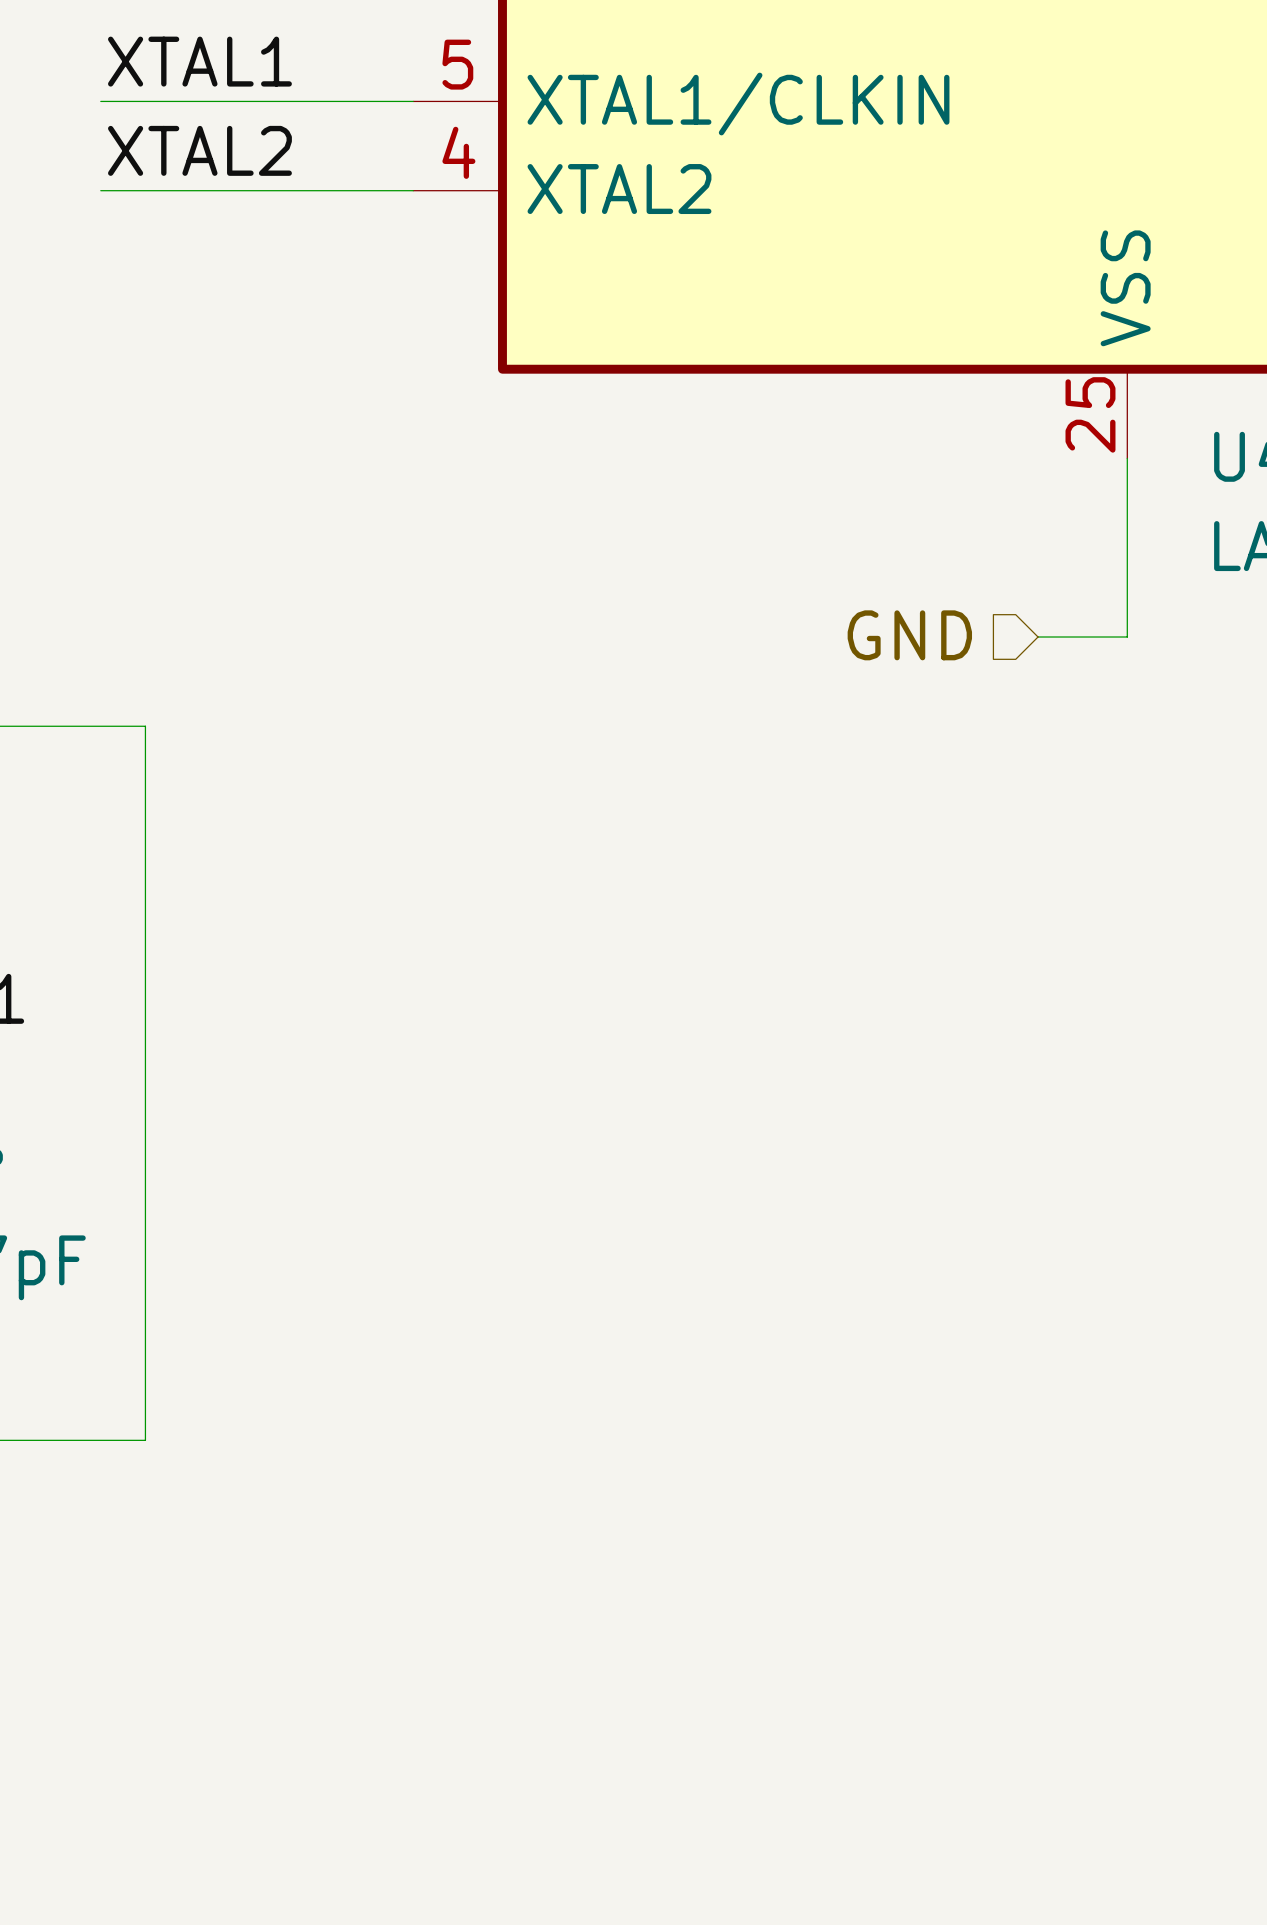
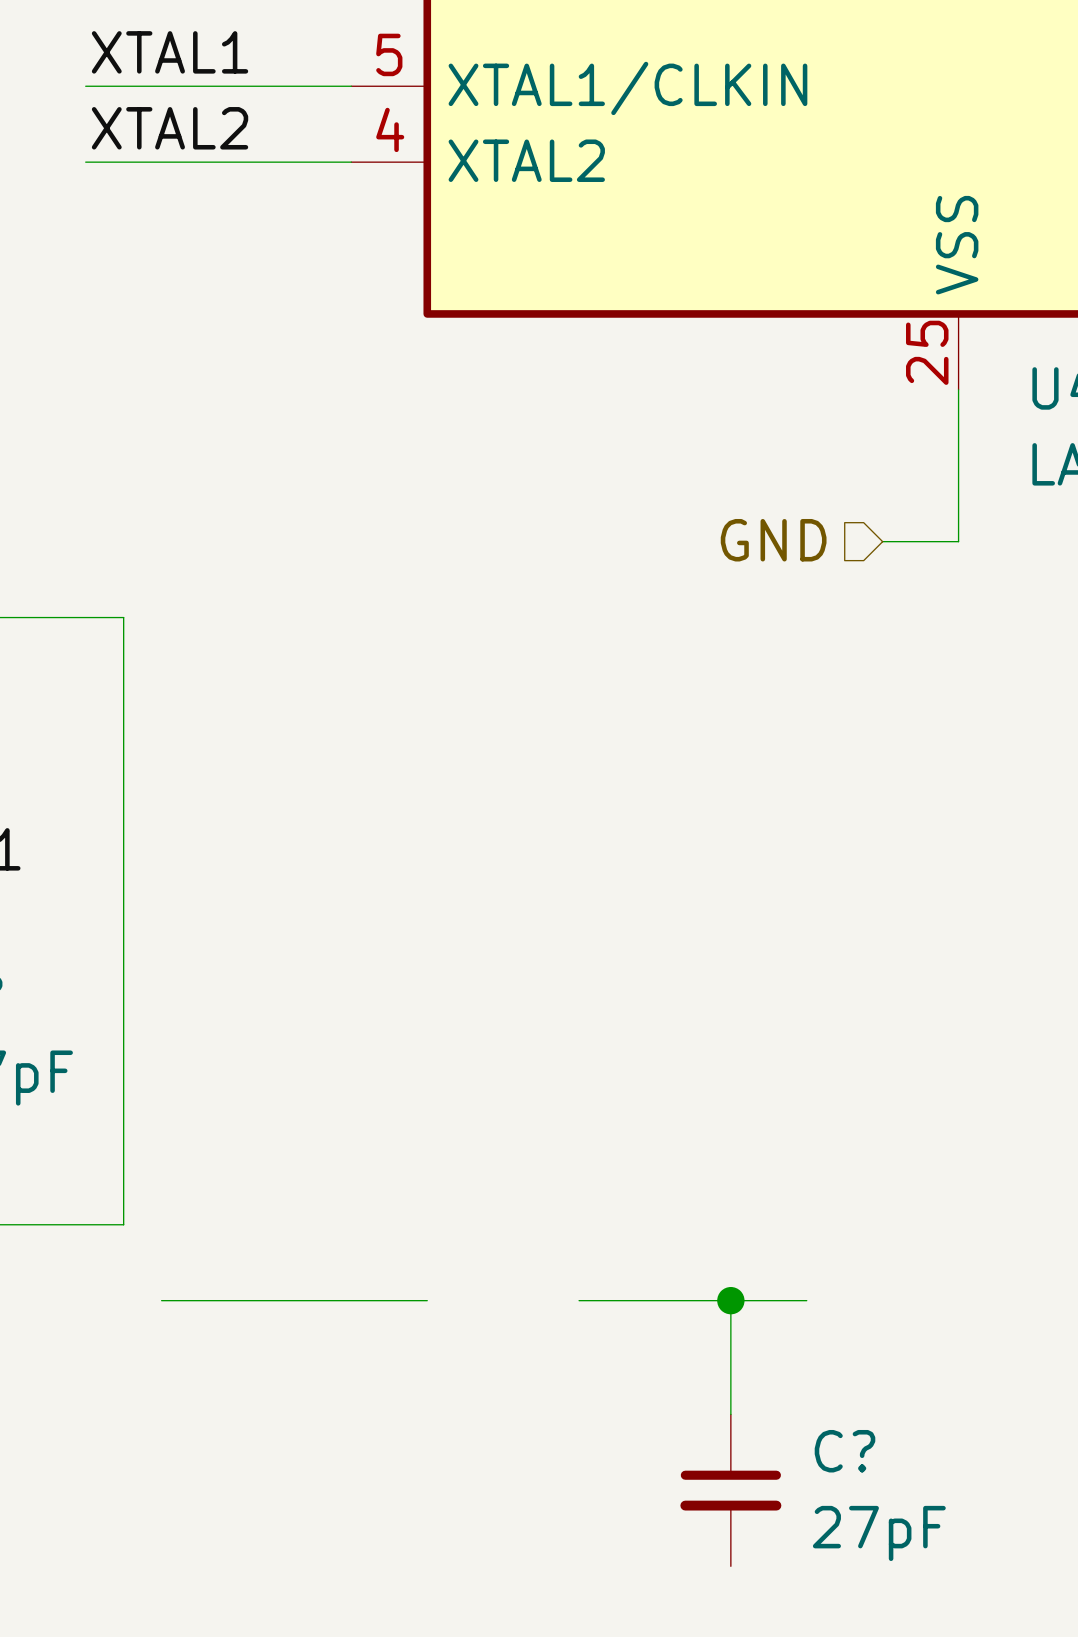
wire: none -> (161, 1300) (427, 1300)
wire: none -> (579, 1300) (806, 1300)
wire: none -> (730, 1300) (730, 1414)
junction: none -> (730, 1300)
C?: none -> 27pF (730, 1490)

